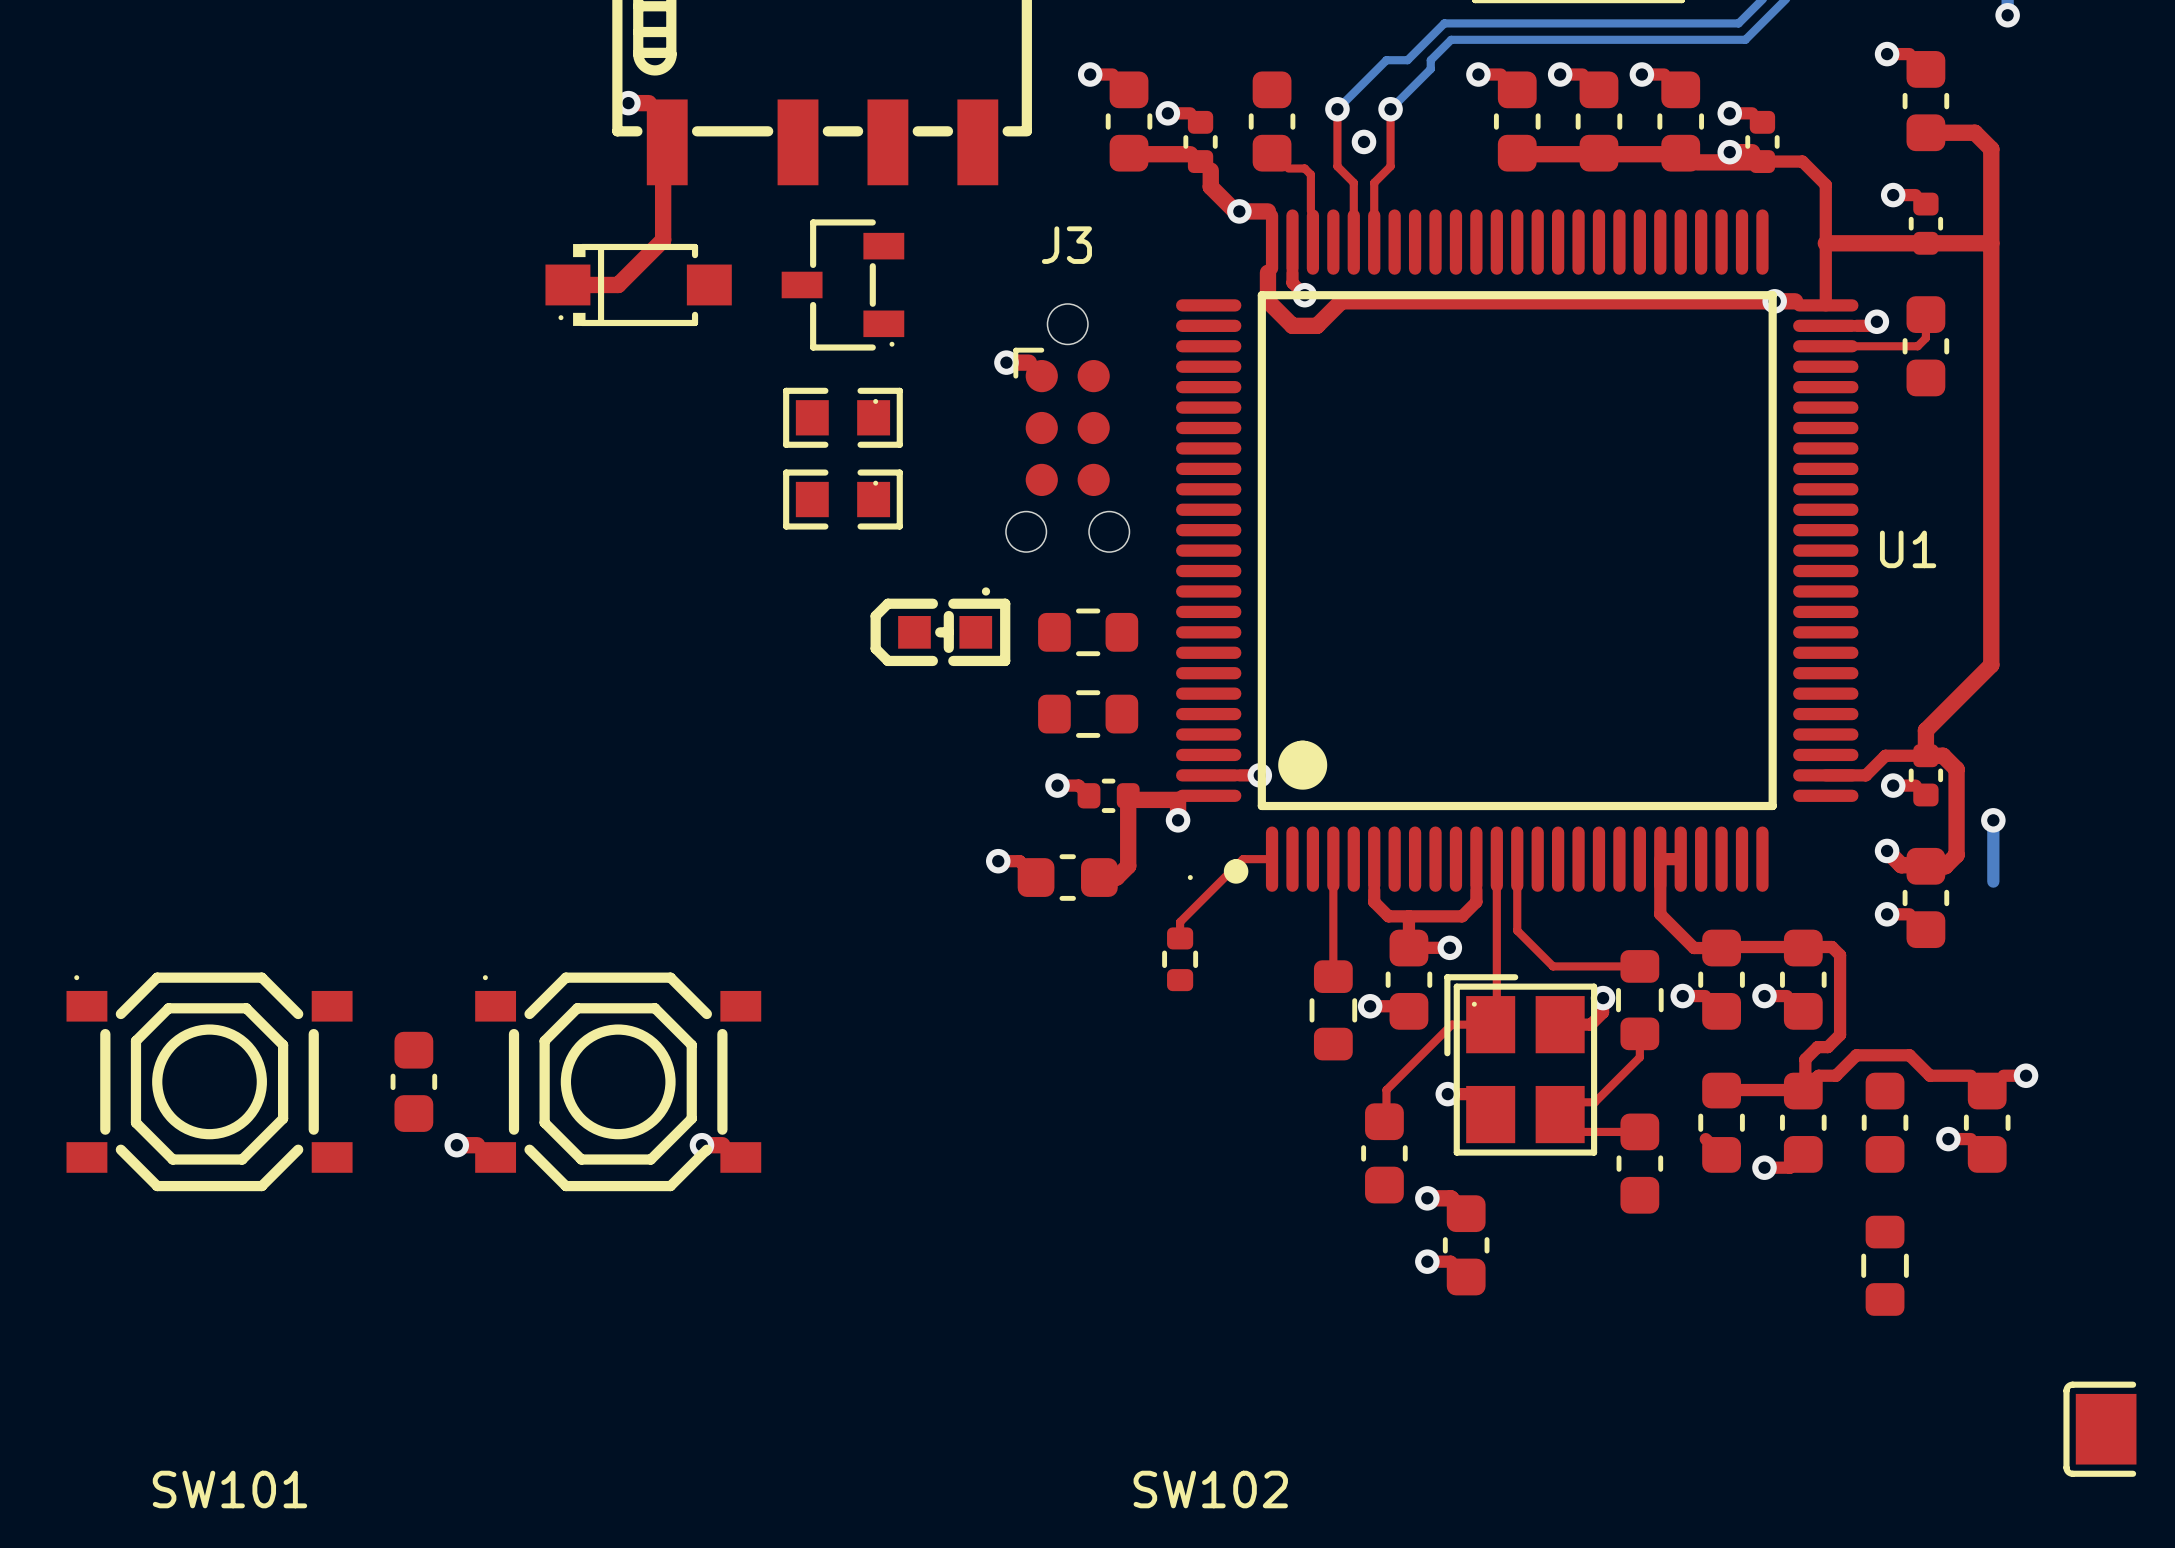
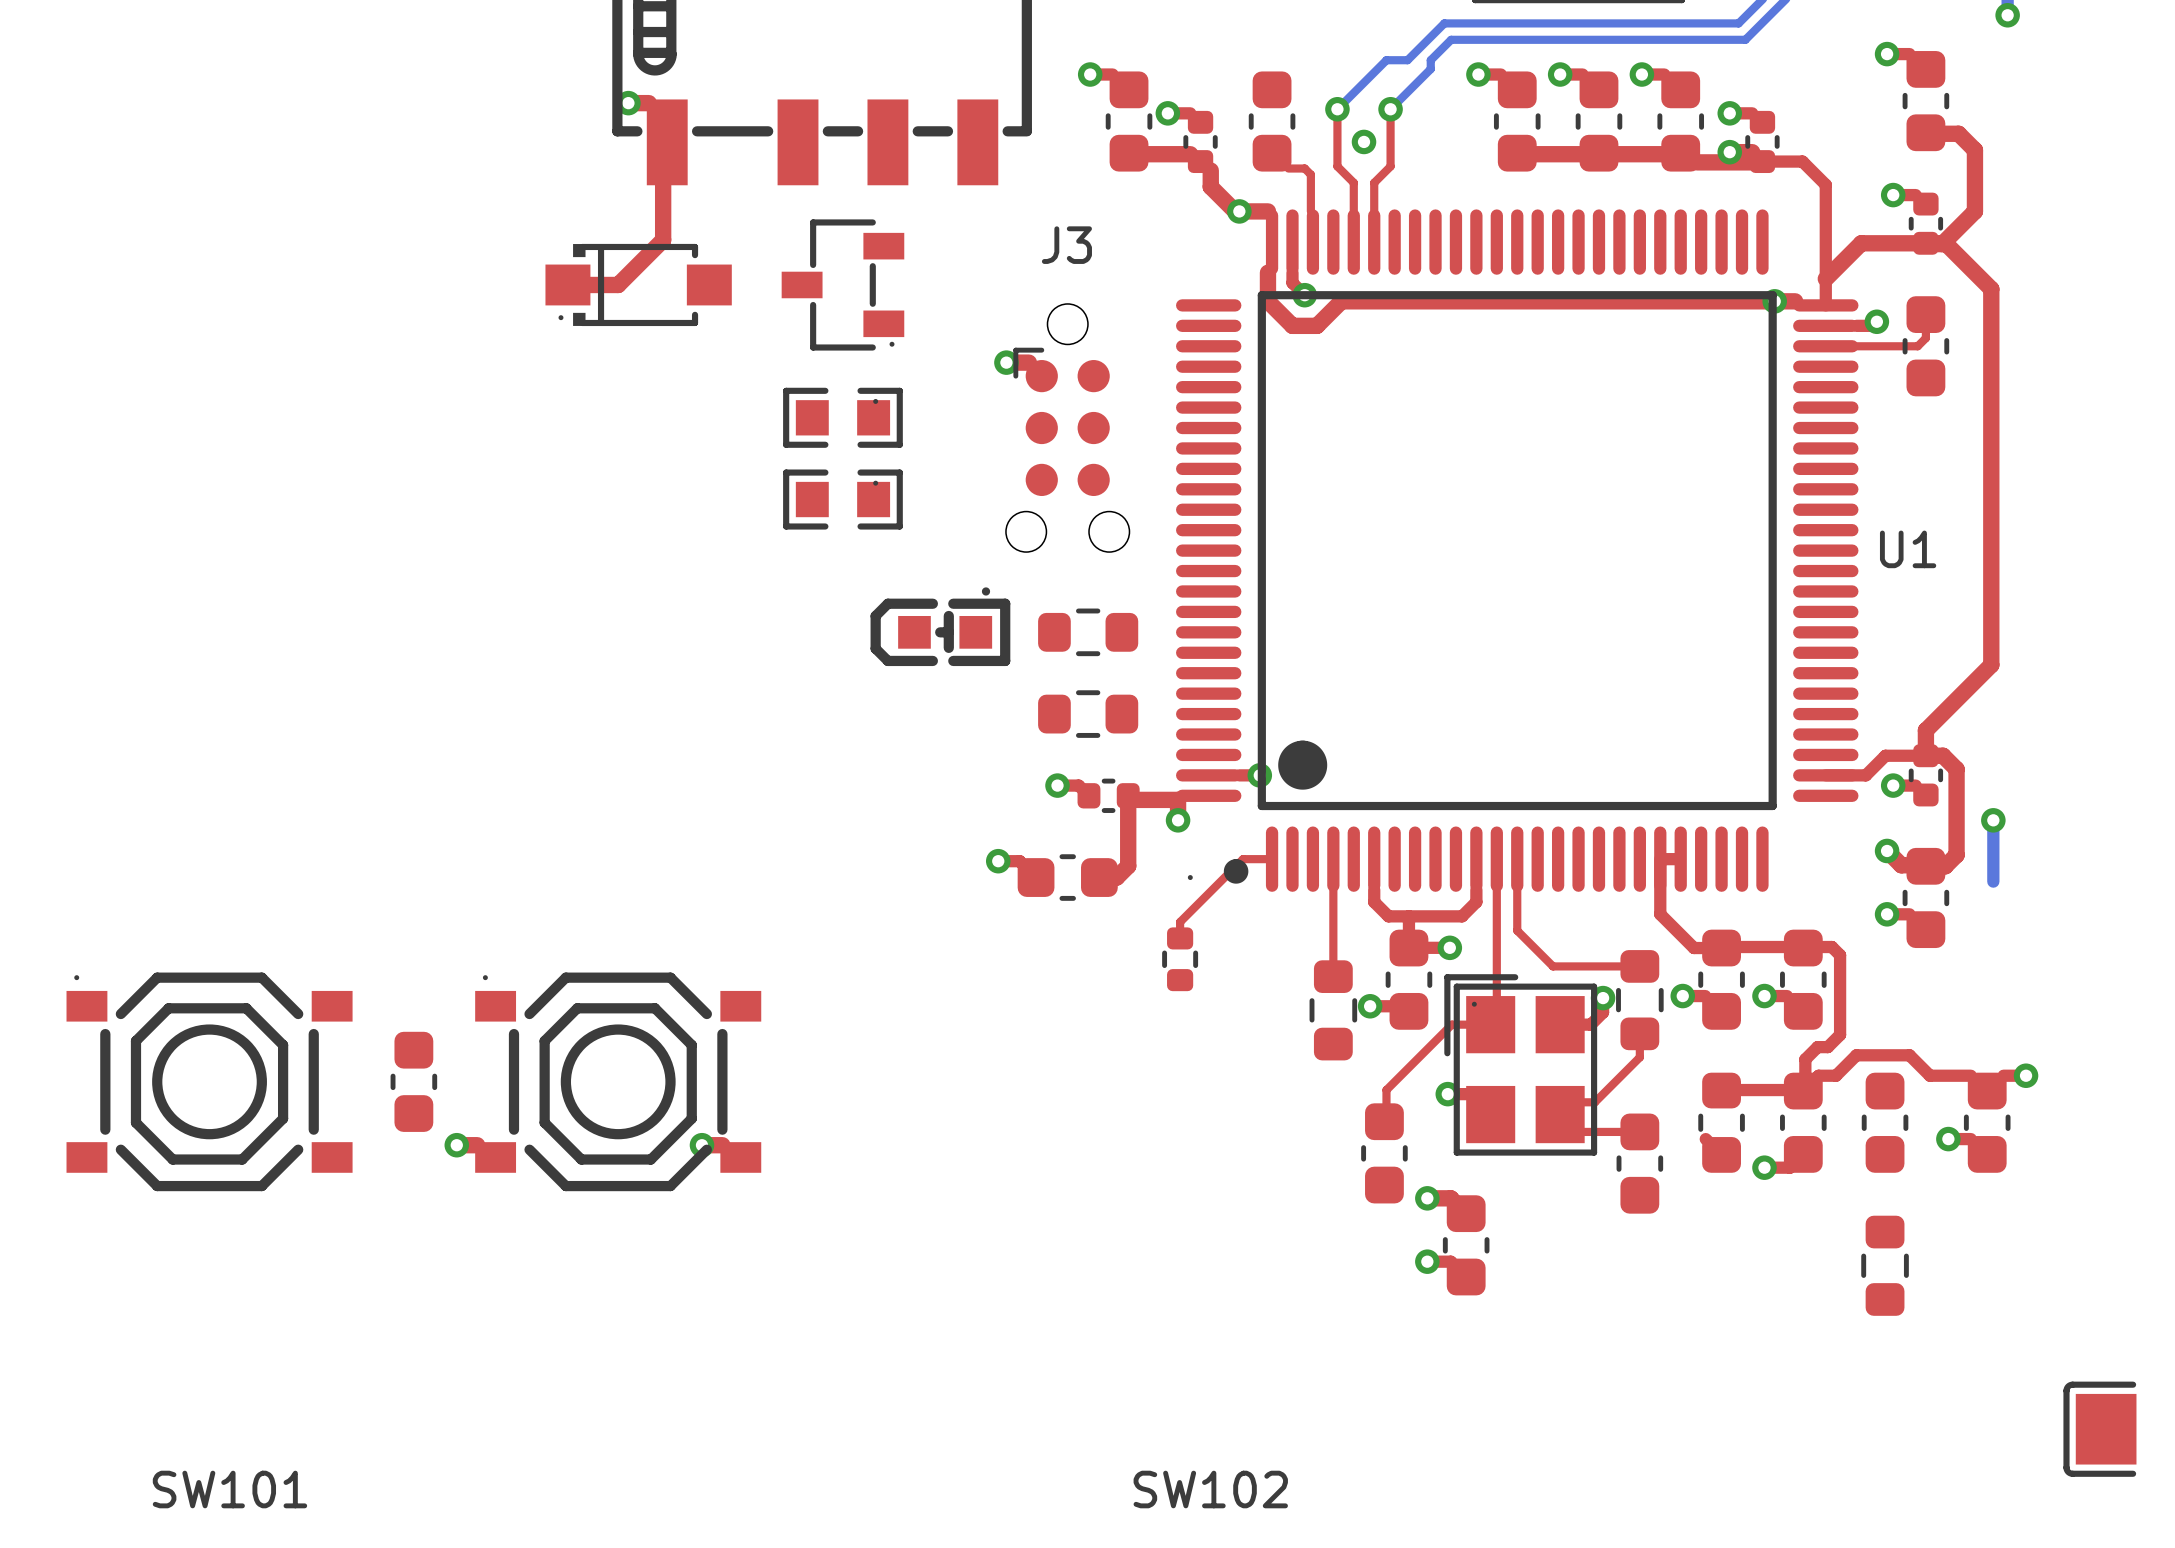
top track: (1925, 132) (1974, 132) (1991, 149) (1991, 289) -> none
top track: none -> (1942, 133) (1958, 133) (1974, 150) (1974, 211) (1942, 244) (1934, 244)
top track: (1825, 243) (1861, 243) -> (1825, 278) (1861, 243)
top track: (1945, 243) (1991, 243) -> (1945, 243) (1991, 289)

